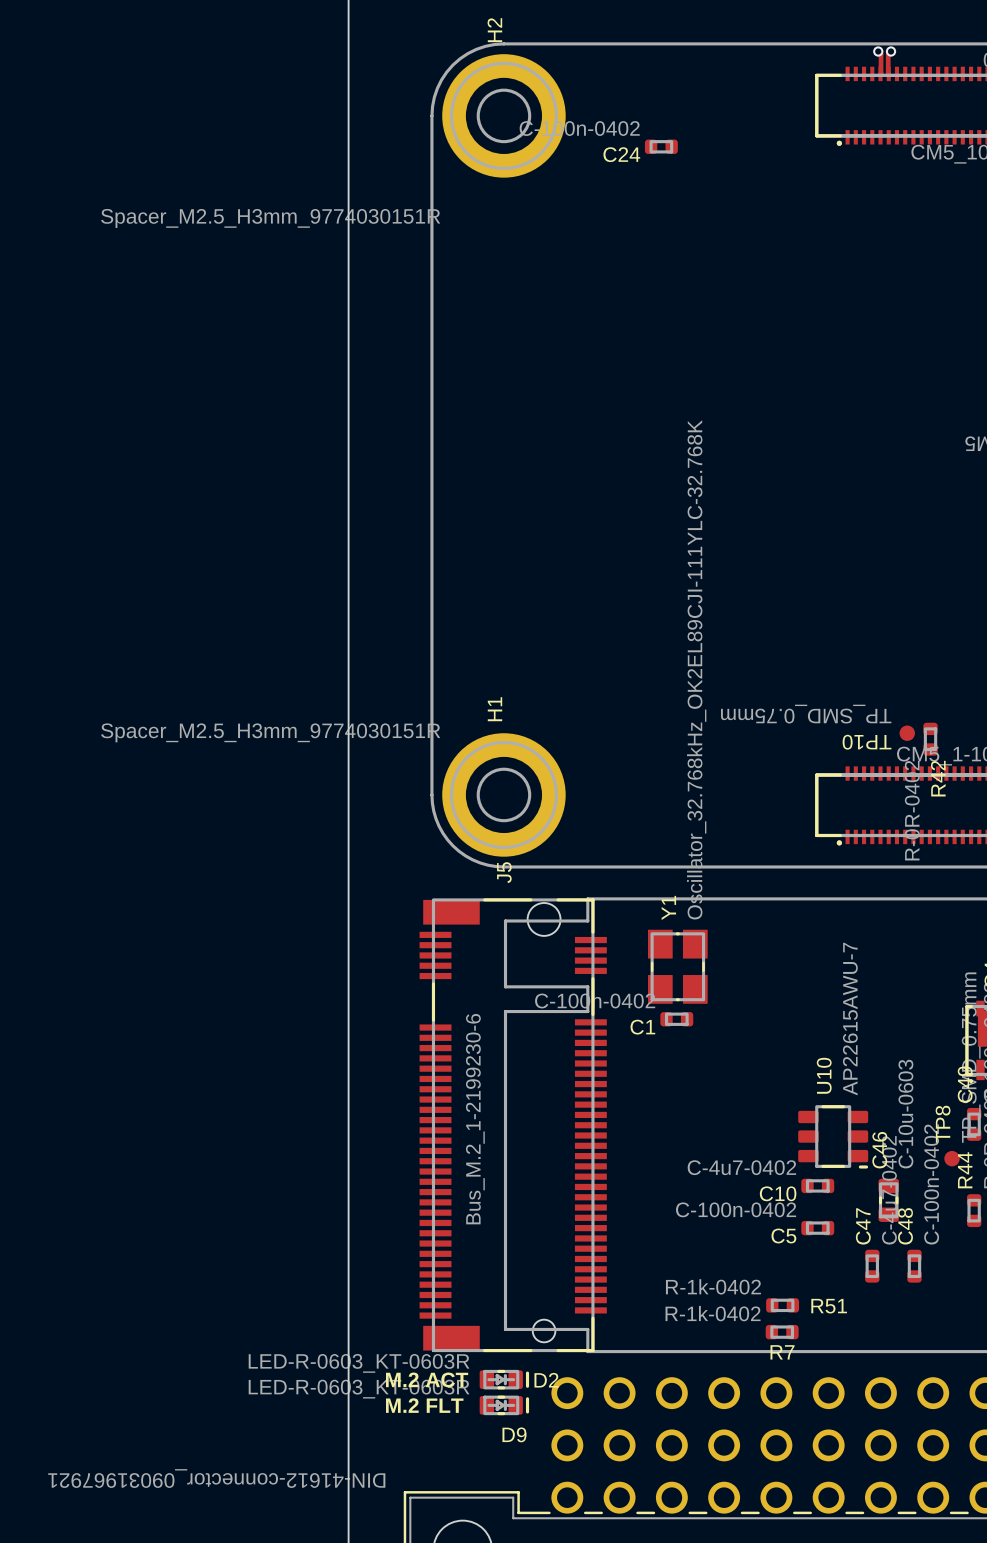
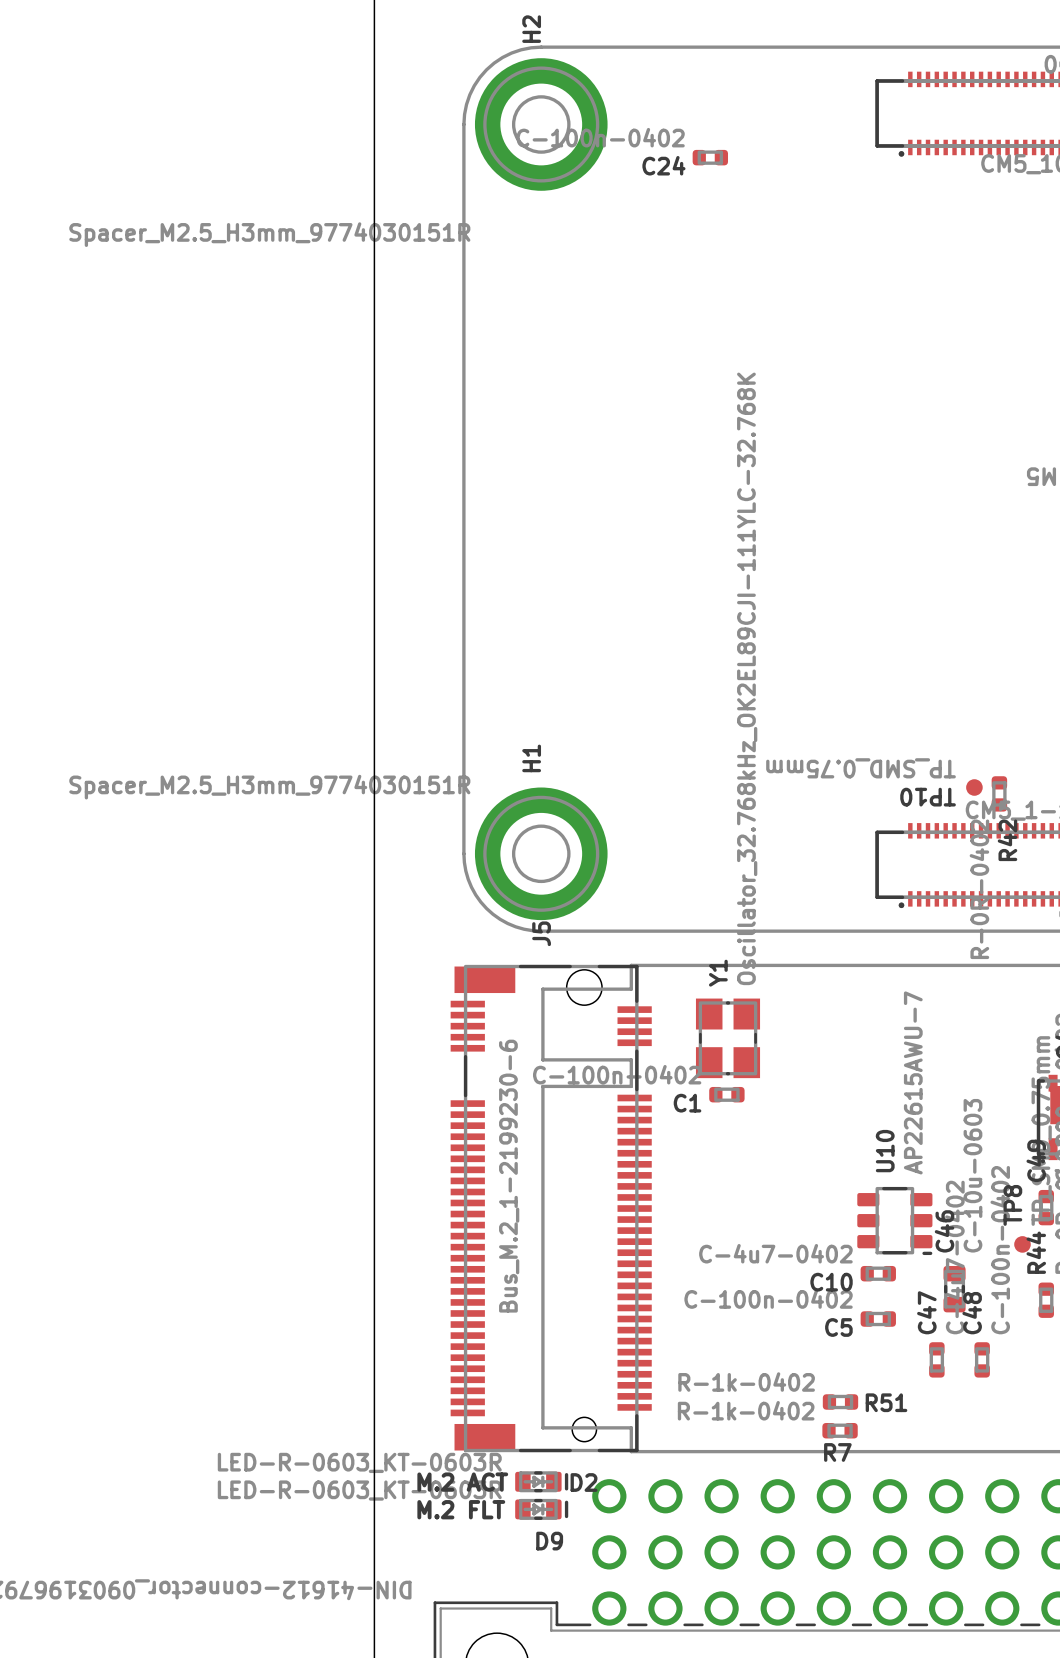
track: (878, 51) (881, 54) (880, 73) -> none
via: (878, 51) -> none
track: (891, 51) (888, 54) (888, 73) -> none
via: (891, 51) -> none

